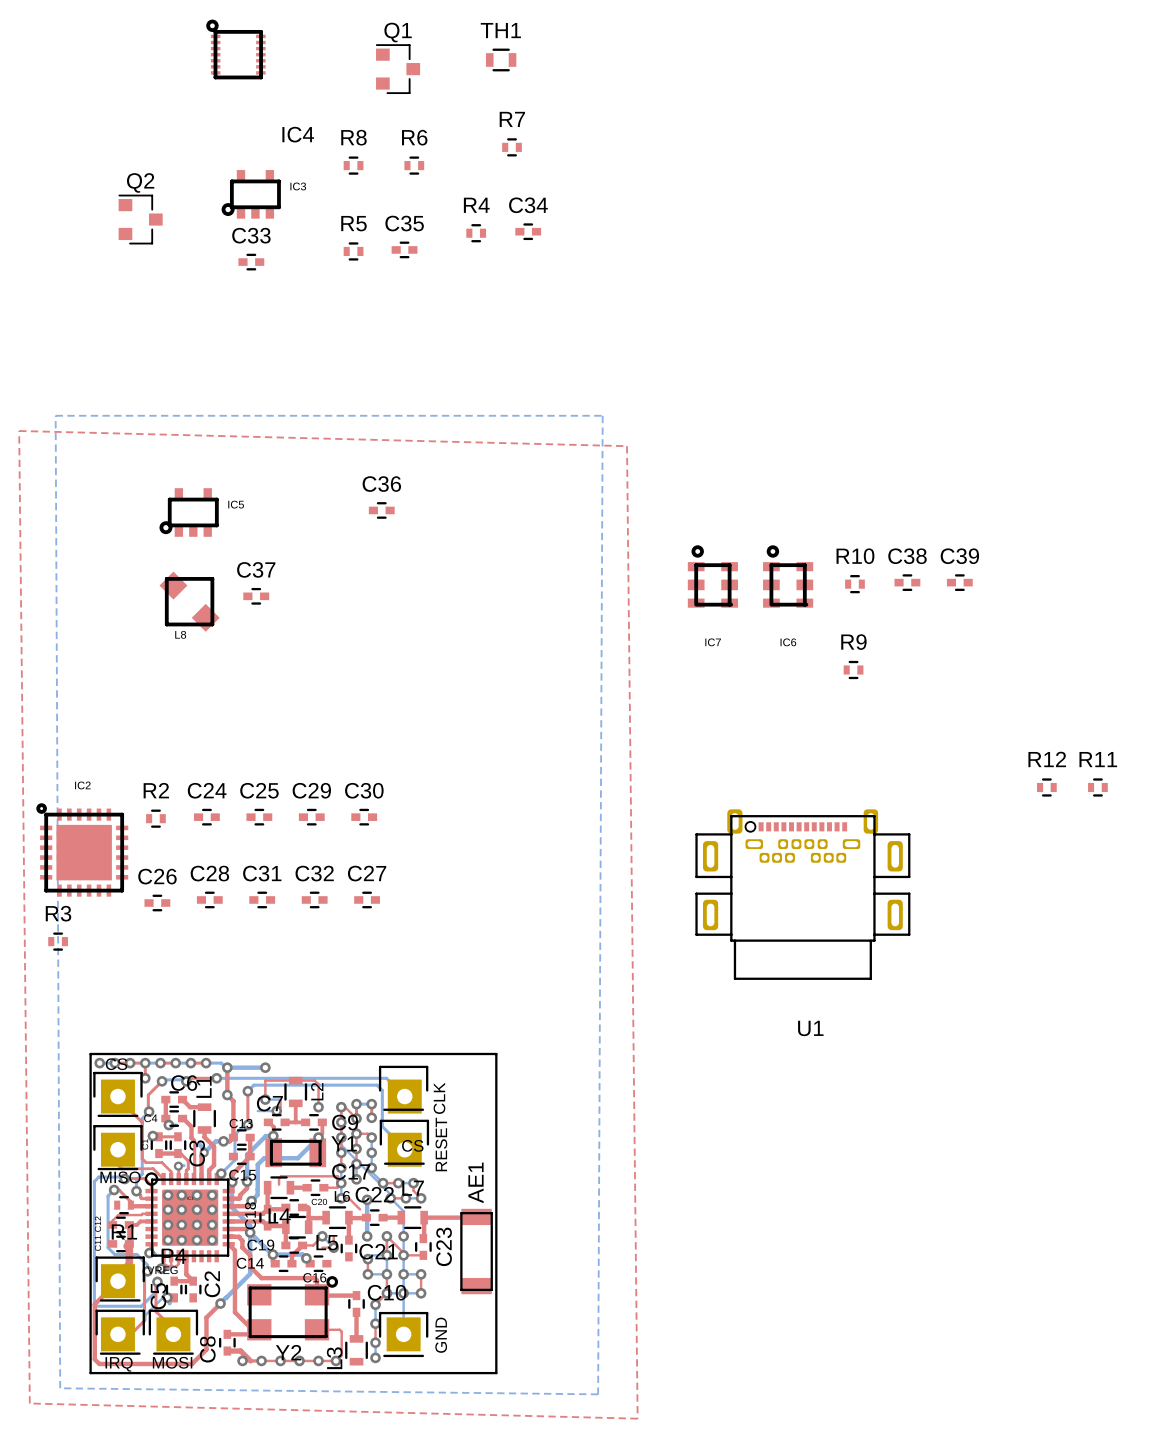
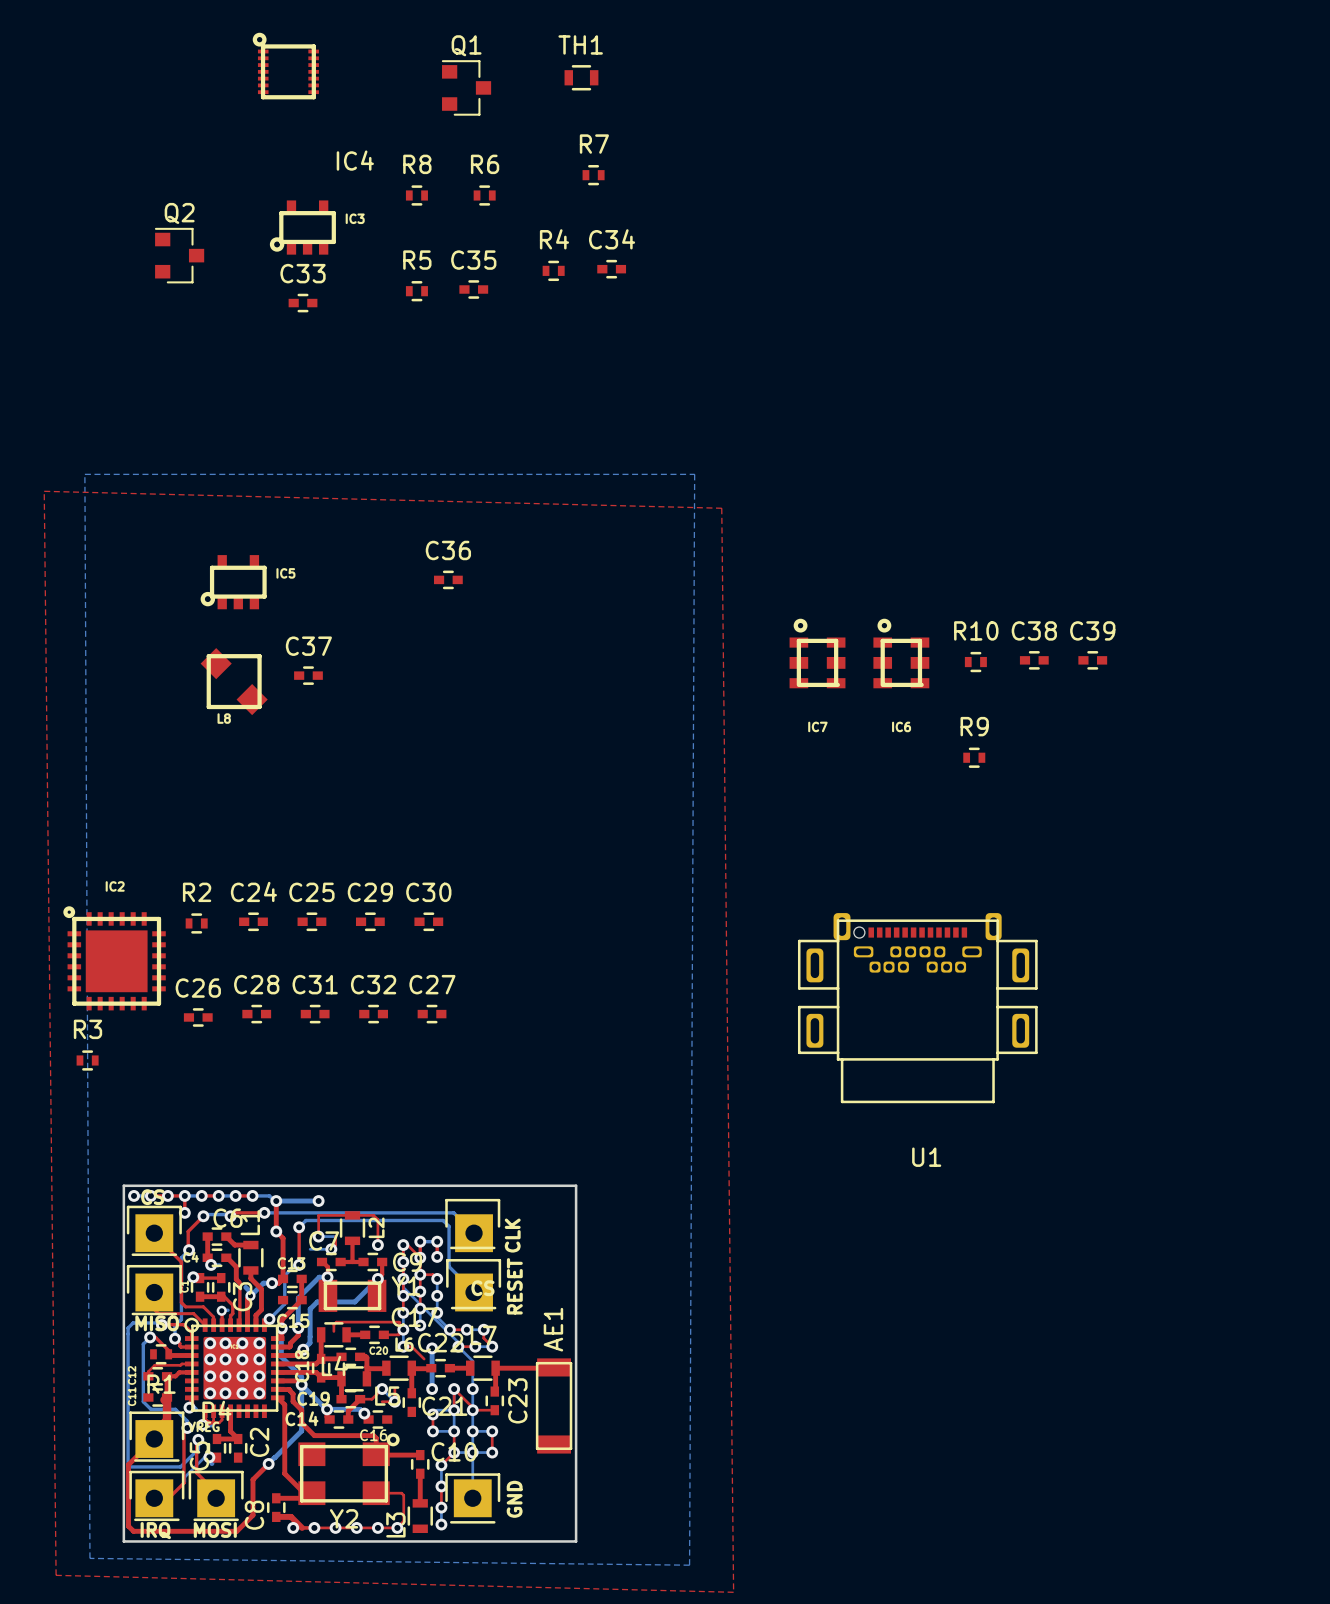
R12: (1046, 787) -> none
R11: (1097, 787) -> none

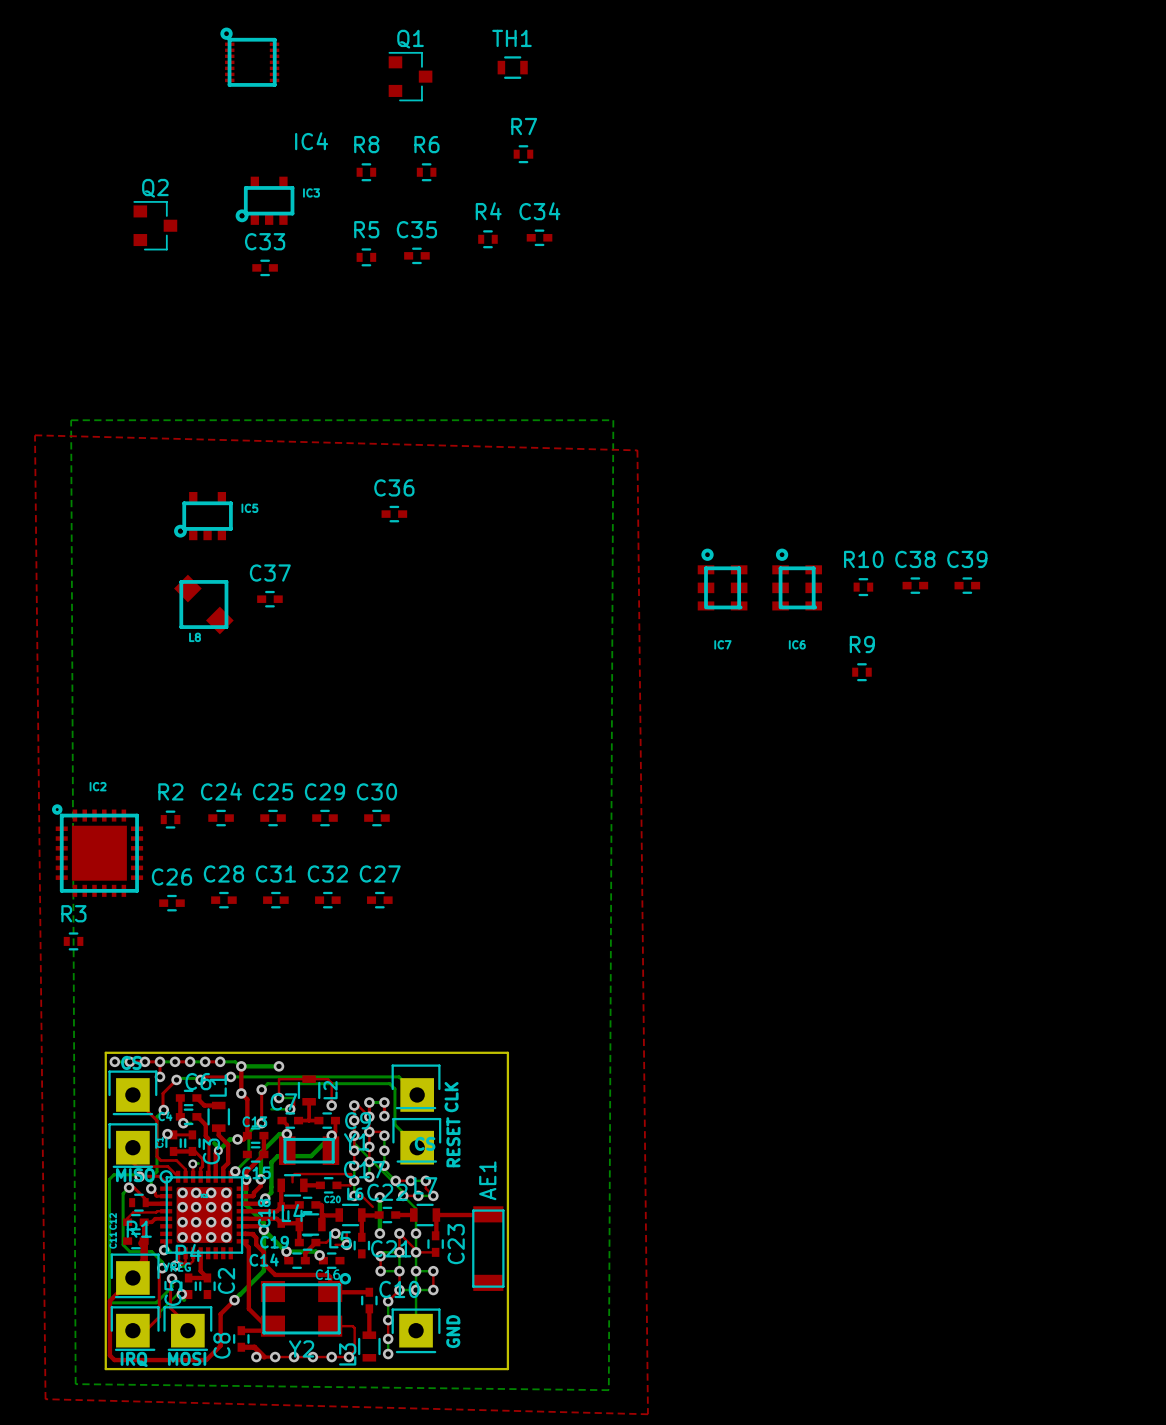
U1: (917, 1008) -> none

